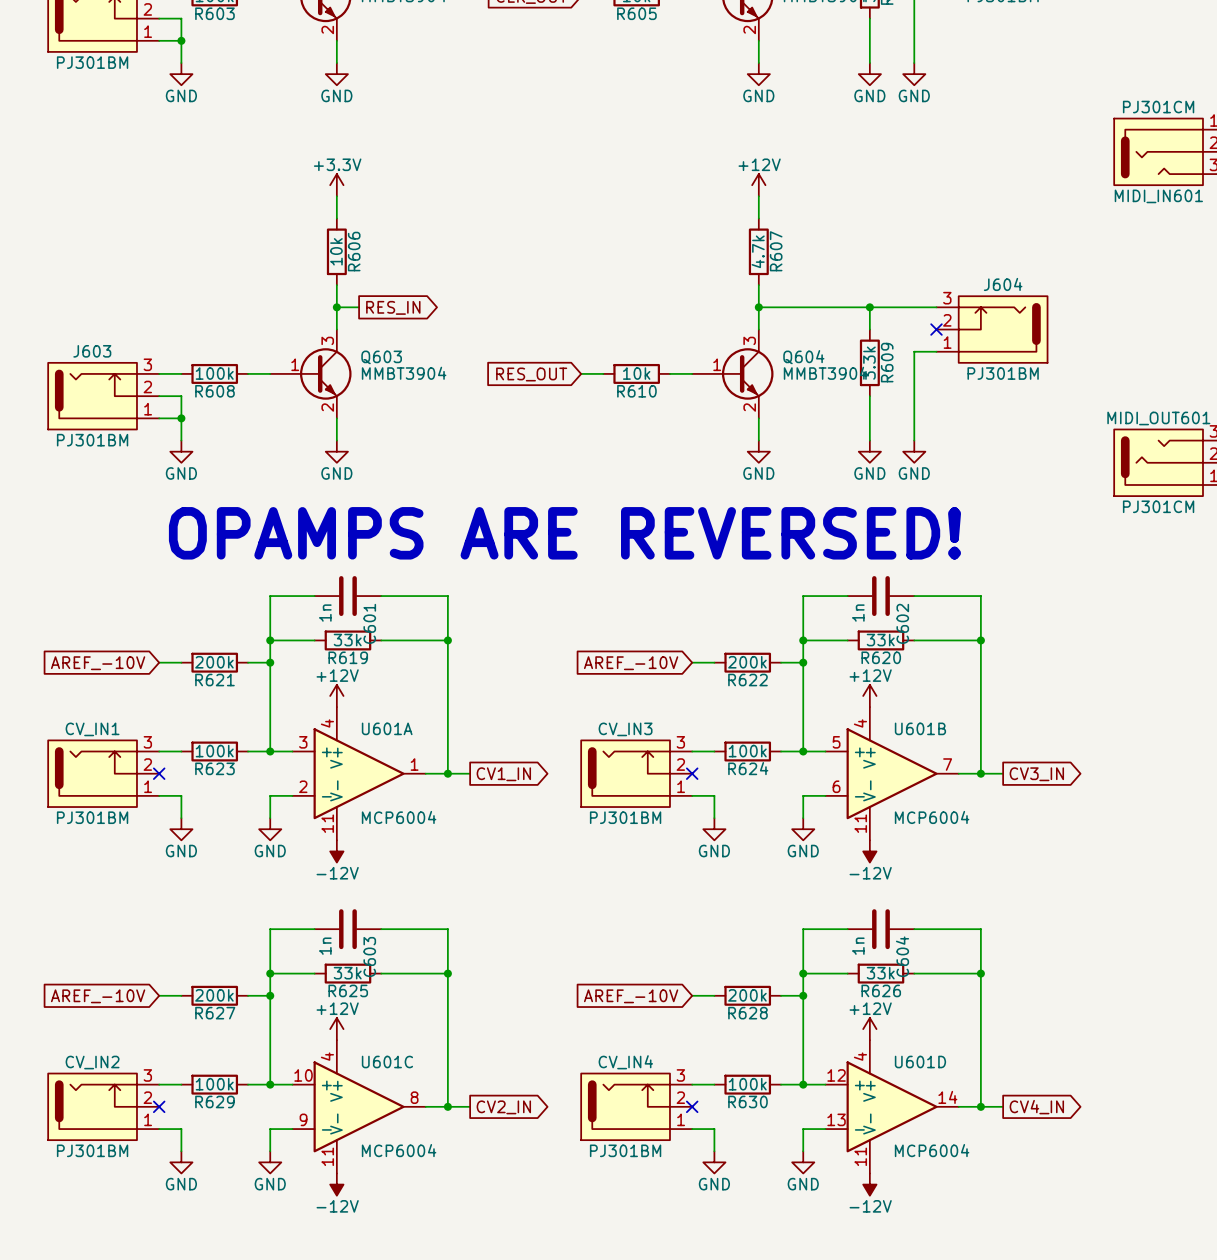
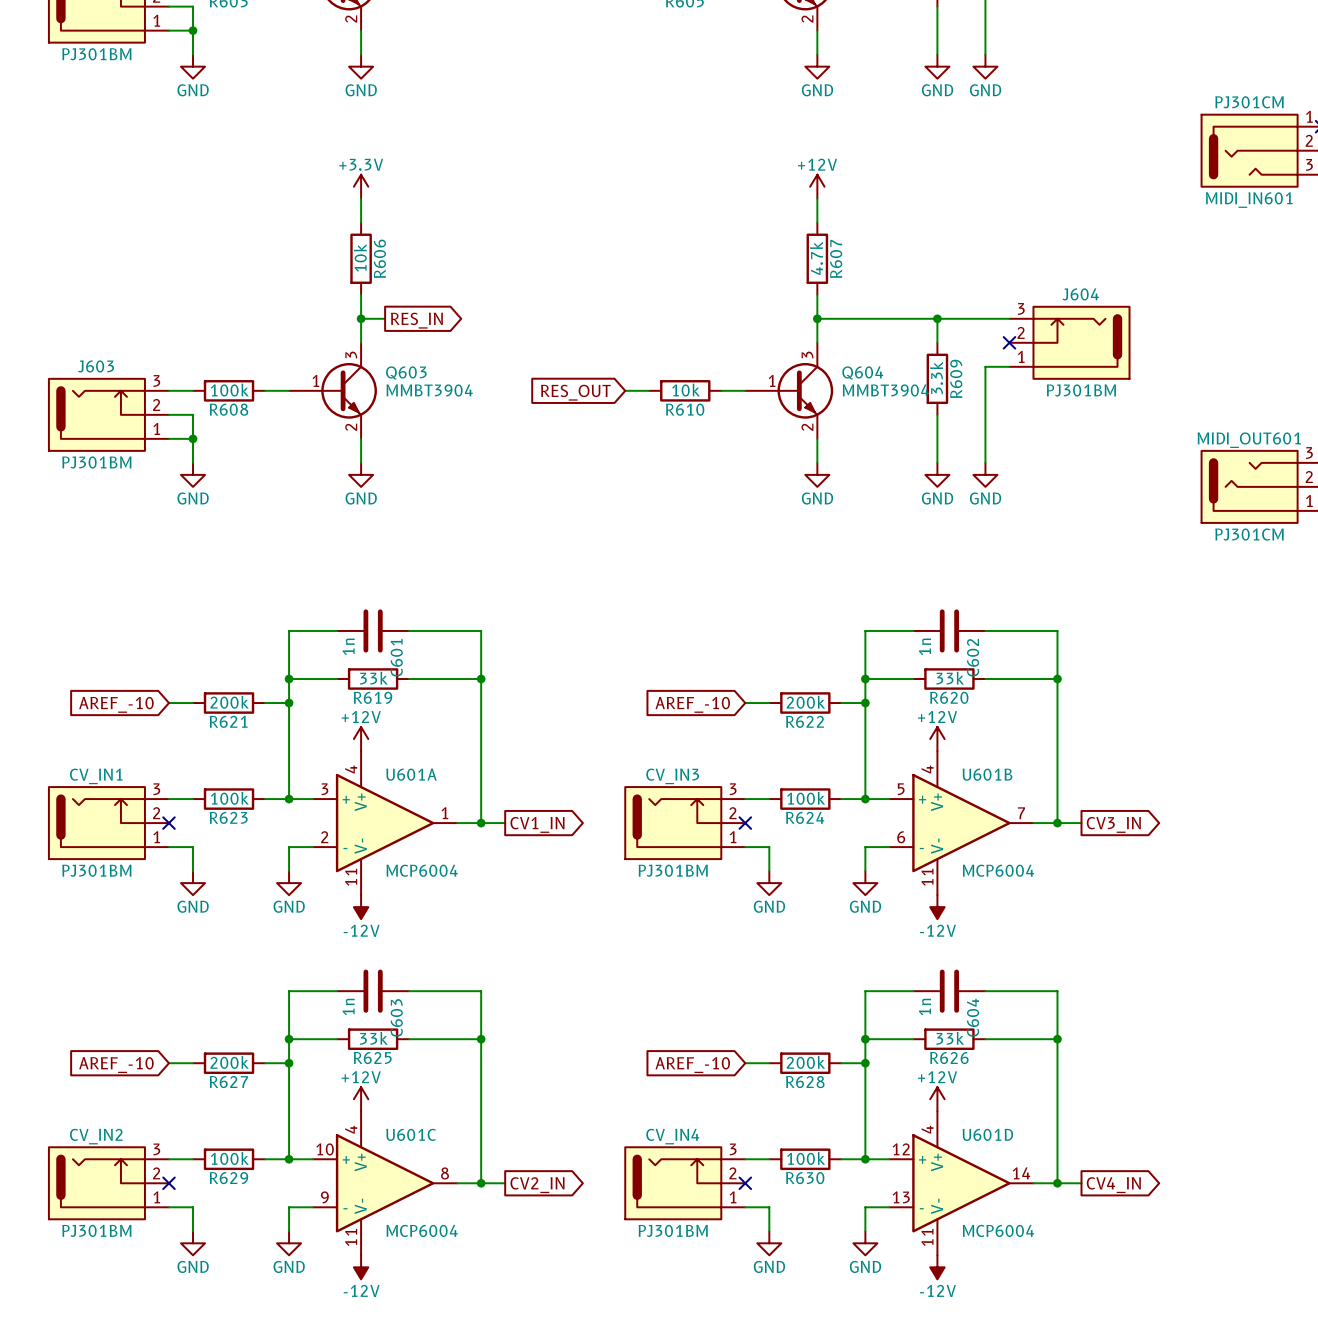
text: OPAMPS ARE REVERSED! (564, 533) -> none
global label: AREF_-10V (98, 663) -> AREF_-10 (116, 704)
global label: AREF_-10V (631, 663) -> AREF_-10 (692, 704)
global label: AREF_-10V (98, 996) -> AREF_-10 (116, 1065)
global label: AREF_-10V (631, 996) -> AREF_-10 (692, 1065)

